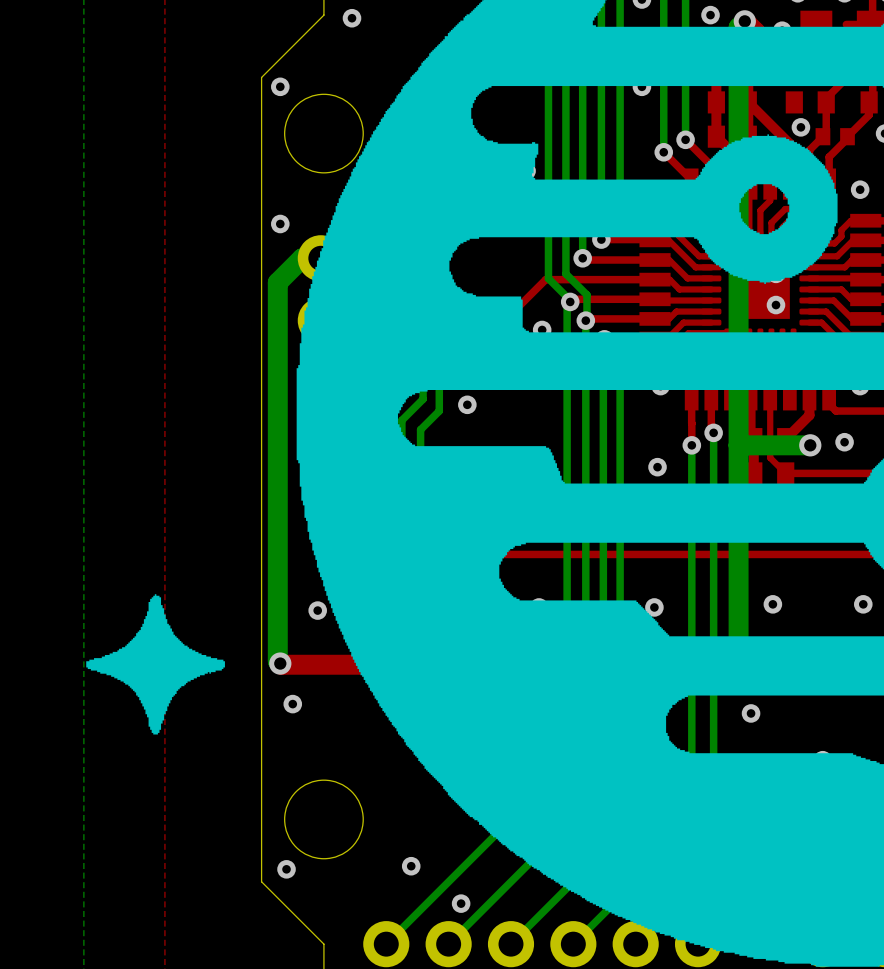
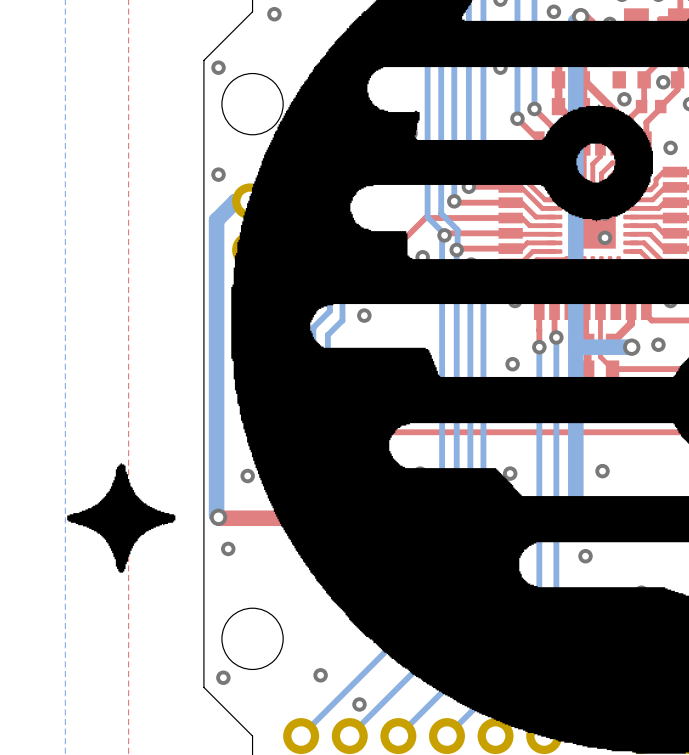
via: none -> (663, 82)
via: (863, 604) -> none

